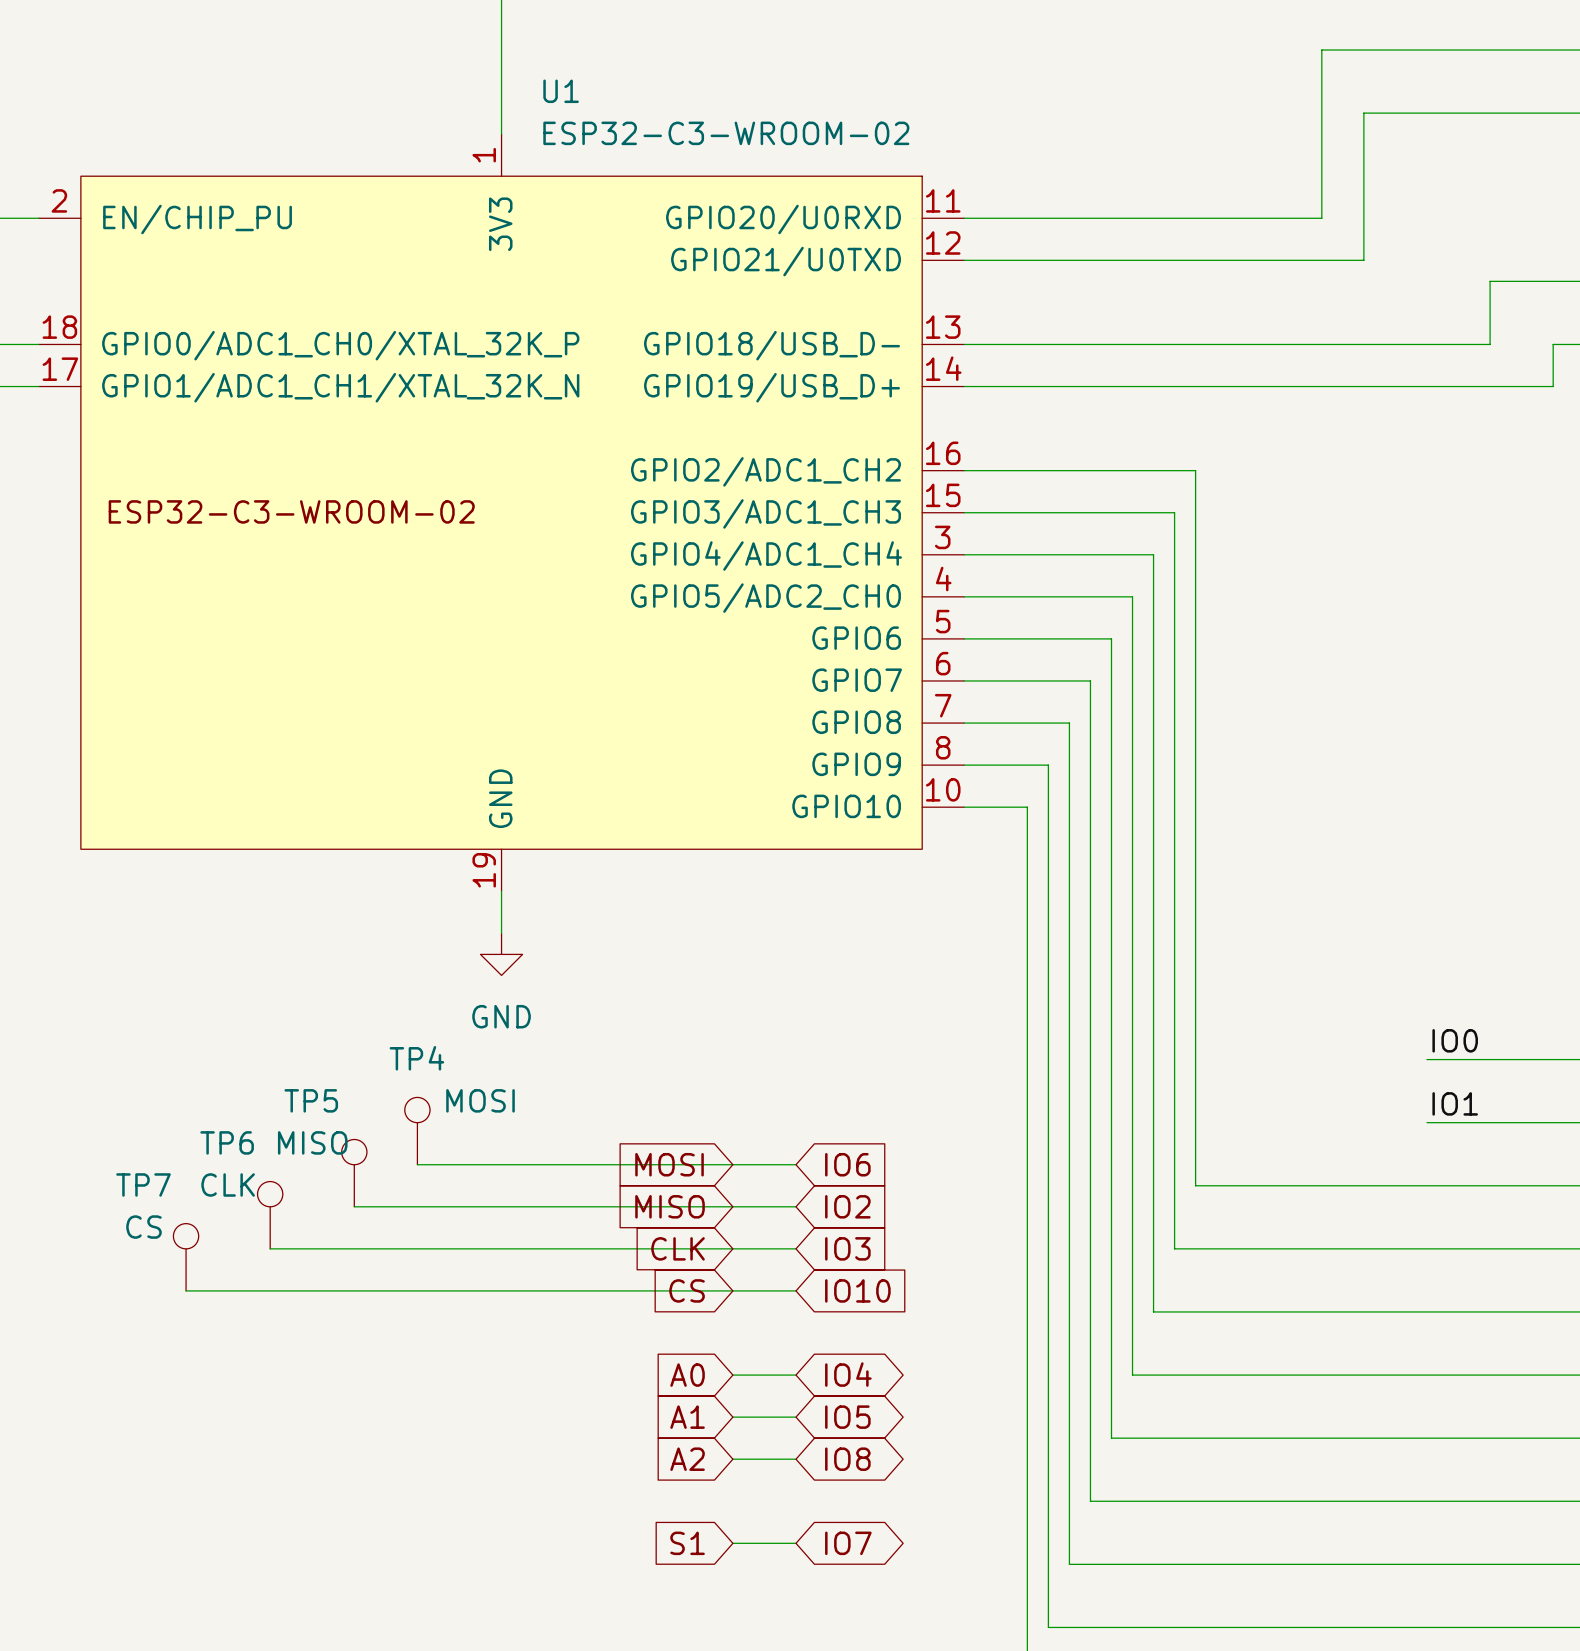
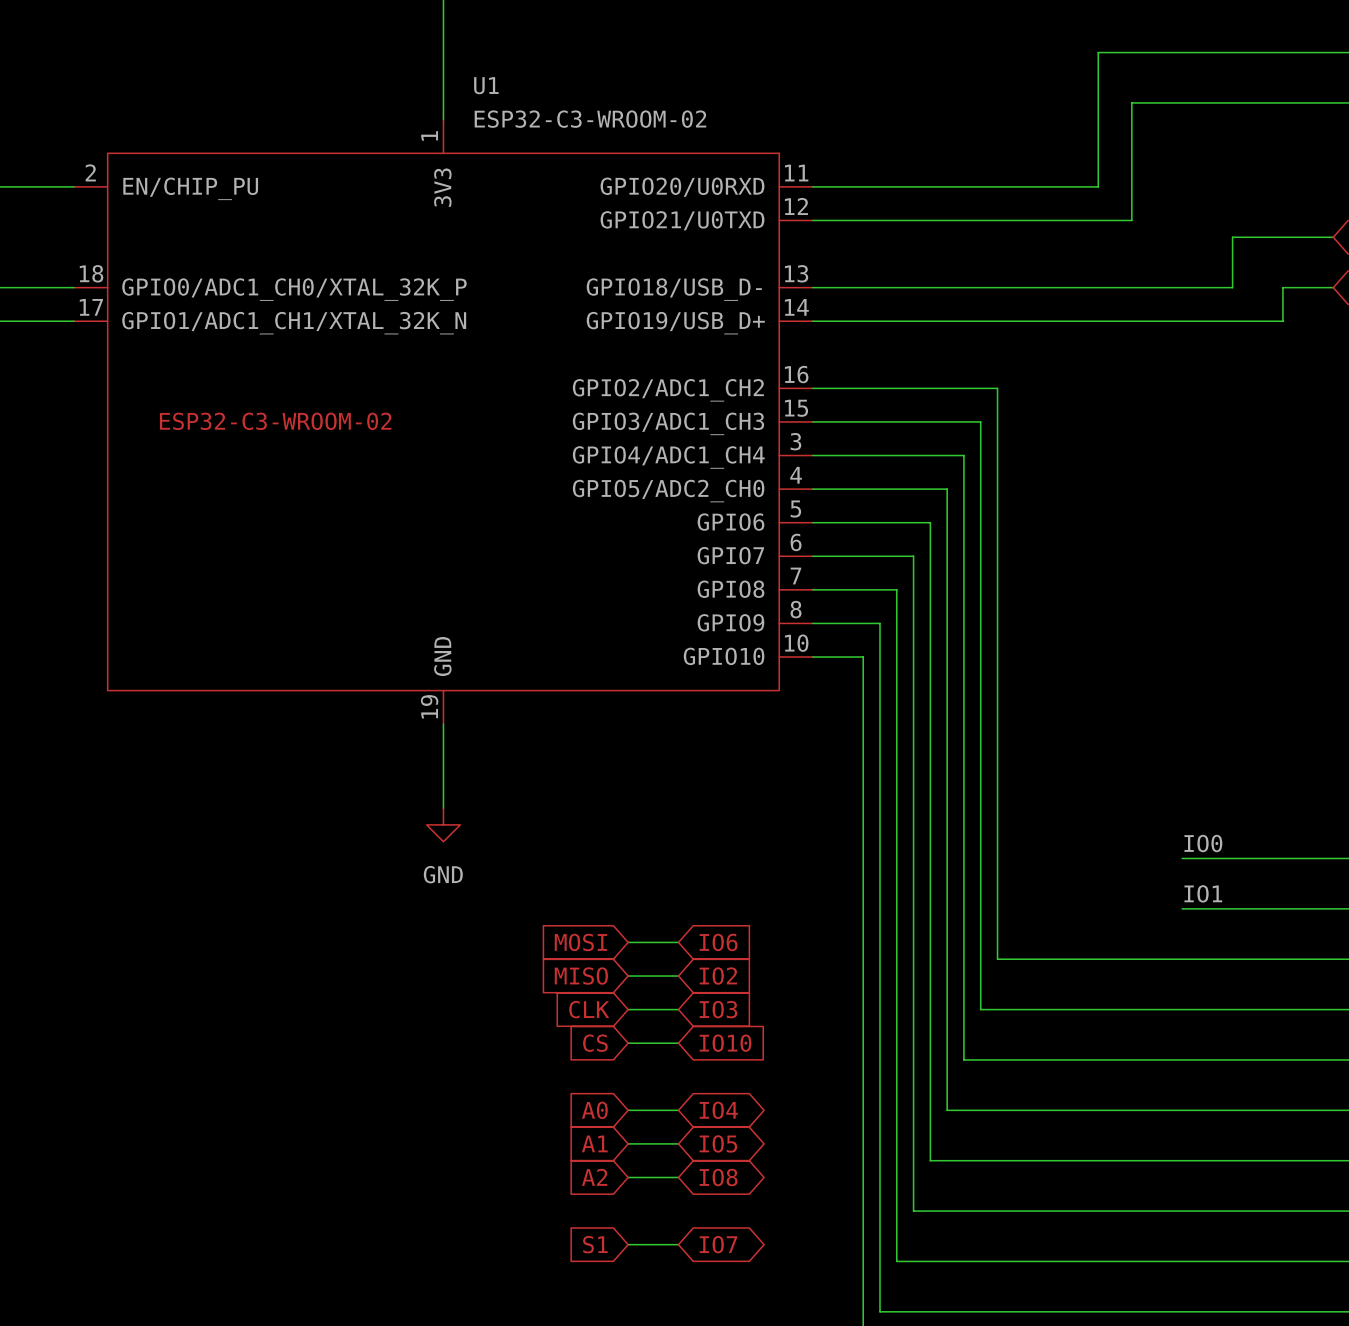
wire: none -> (443, 757) (443, 808)
power symbol position: GND (501, 954) -> GND (443, 824)
TP4: MOSI (417, 1131) -> none
wire: (417, 1164) (732, 1164) -> none
TP5: MISO (354, 1173) -> none
wire: (354, 1206) (732, 1206) -> none
TP6: CLK (270, 1215) -> none
wire: (270, 1248) (732, 1248) -> none
TP7: CS (186, 1257) -> none
wire: (186, 1290) (732, 1290) -> none

